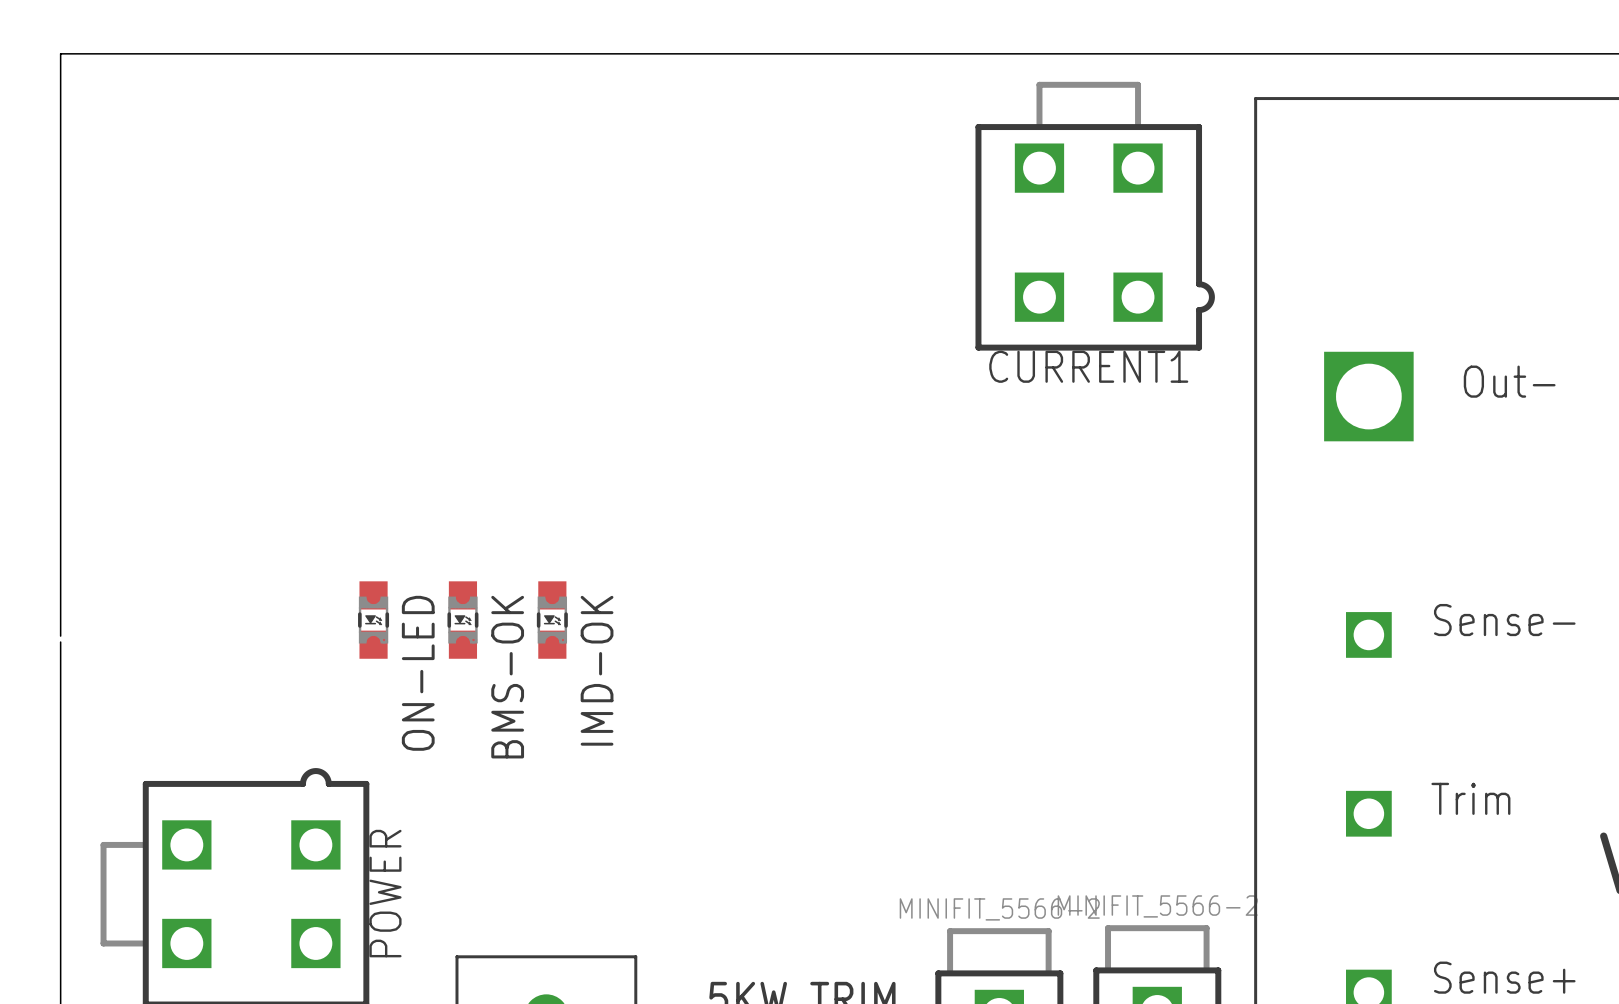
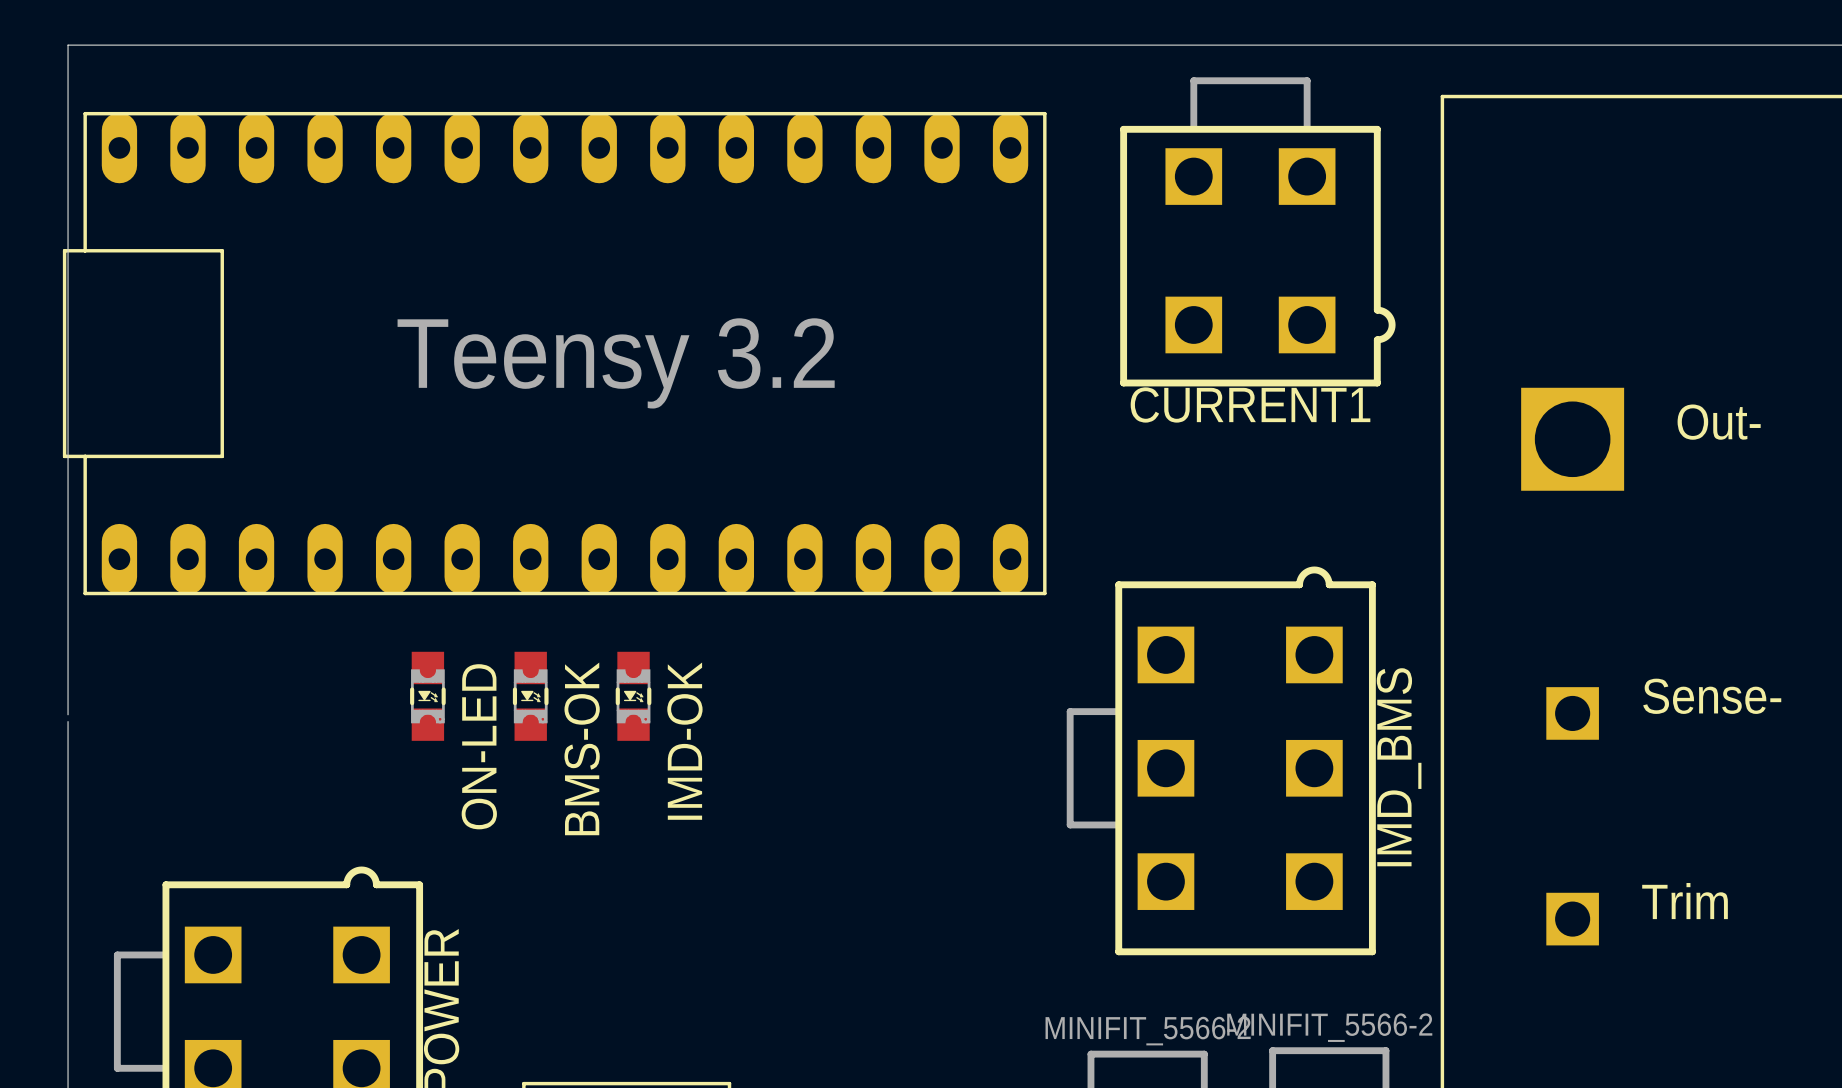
part: none -> (554, 353)
IMD_BMS: none -> (1221, 760)

